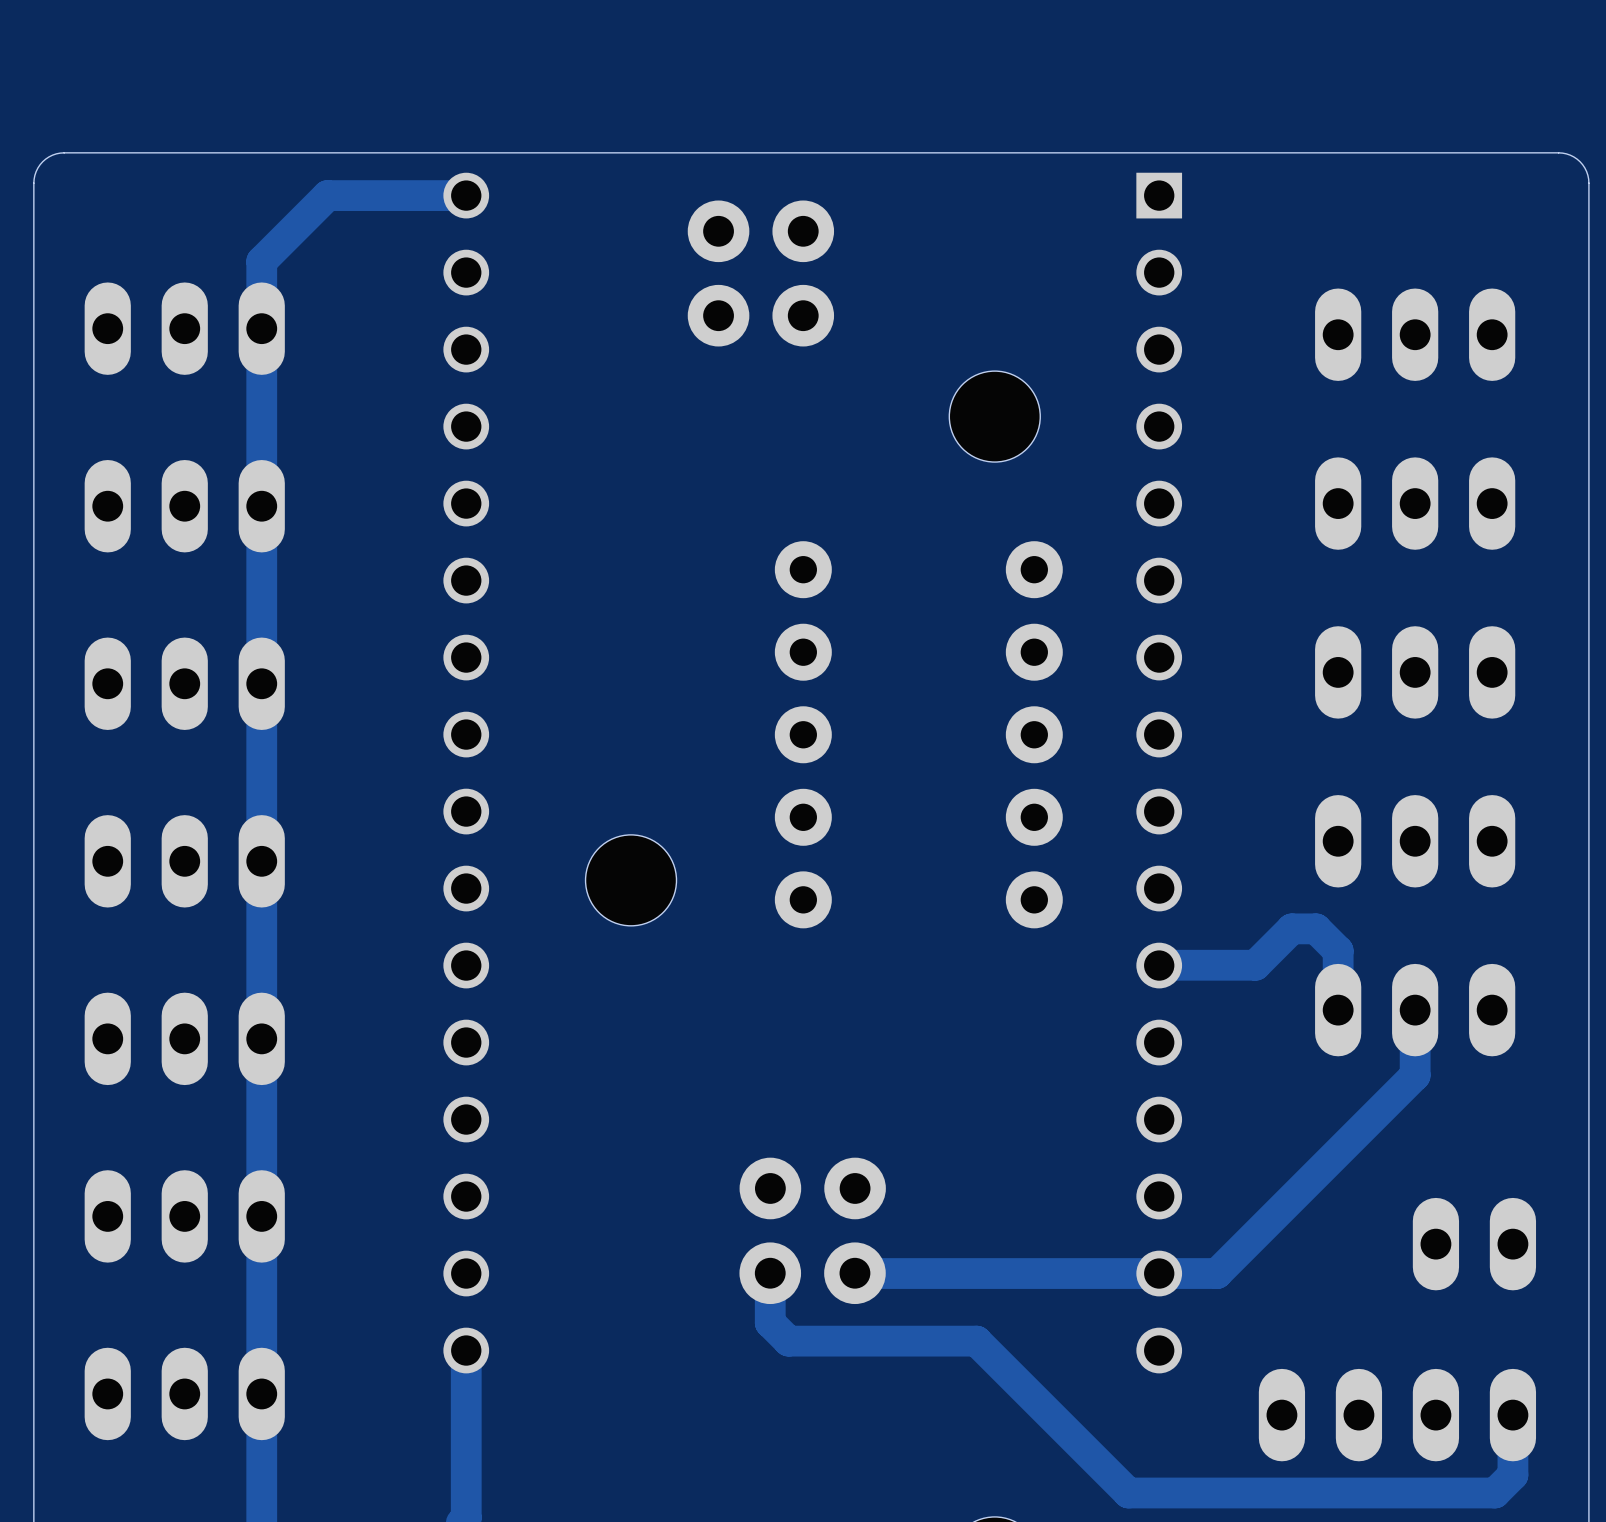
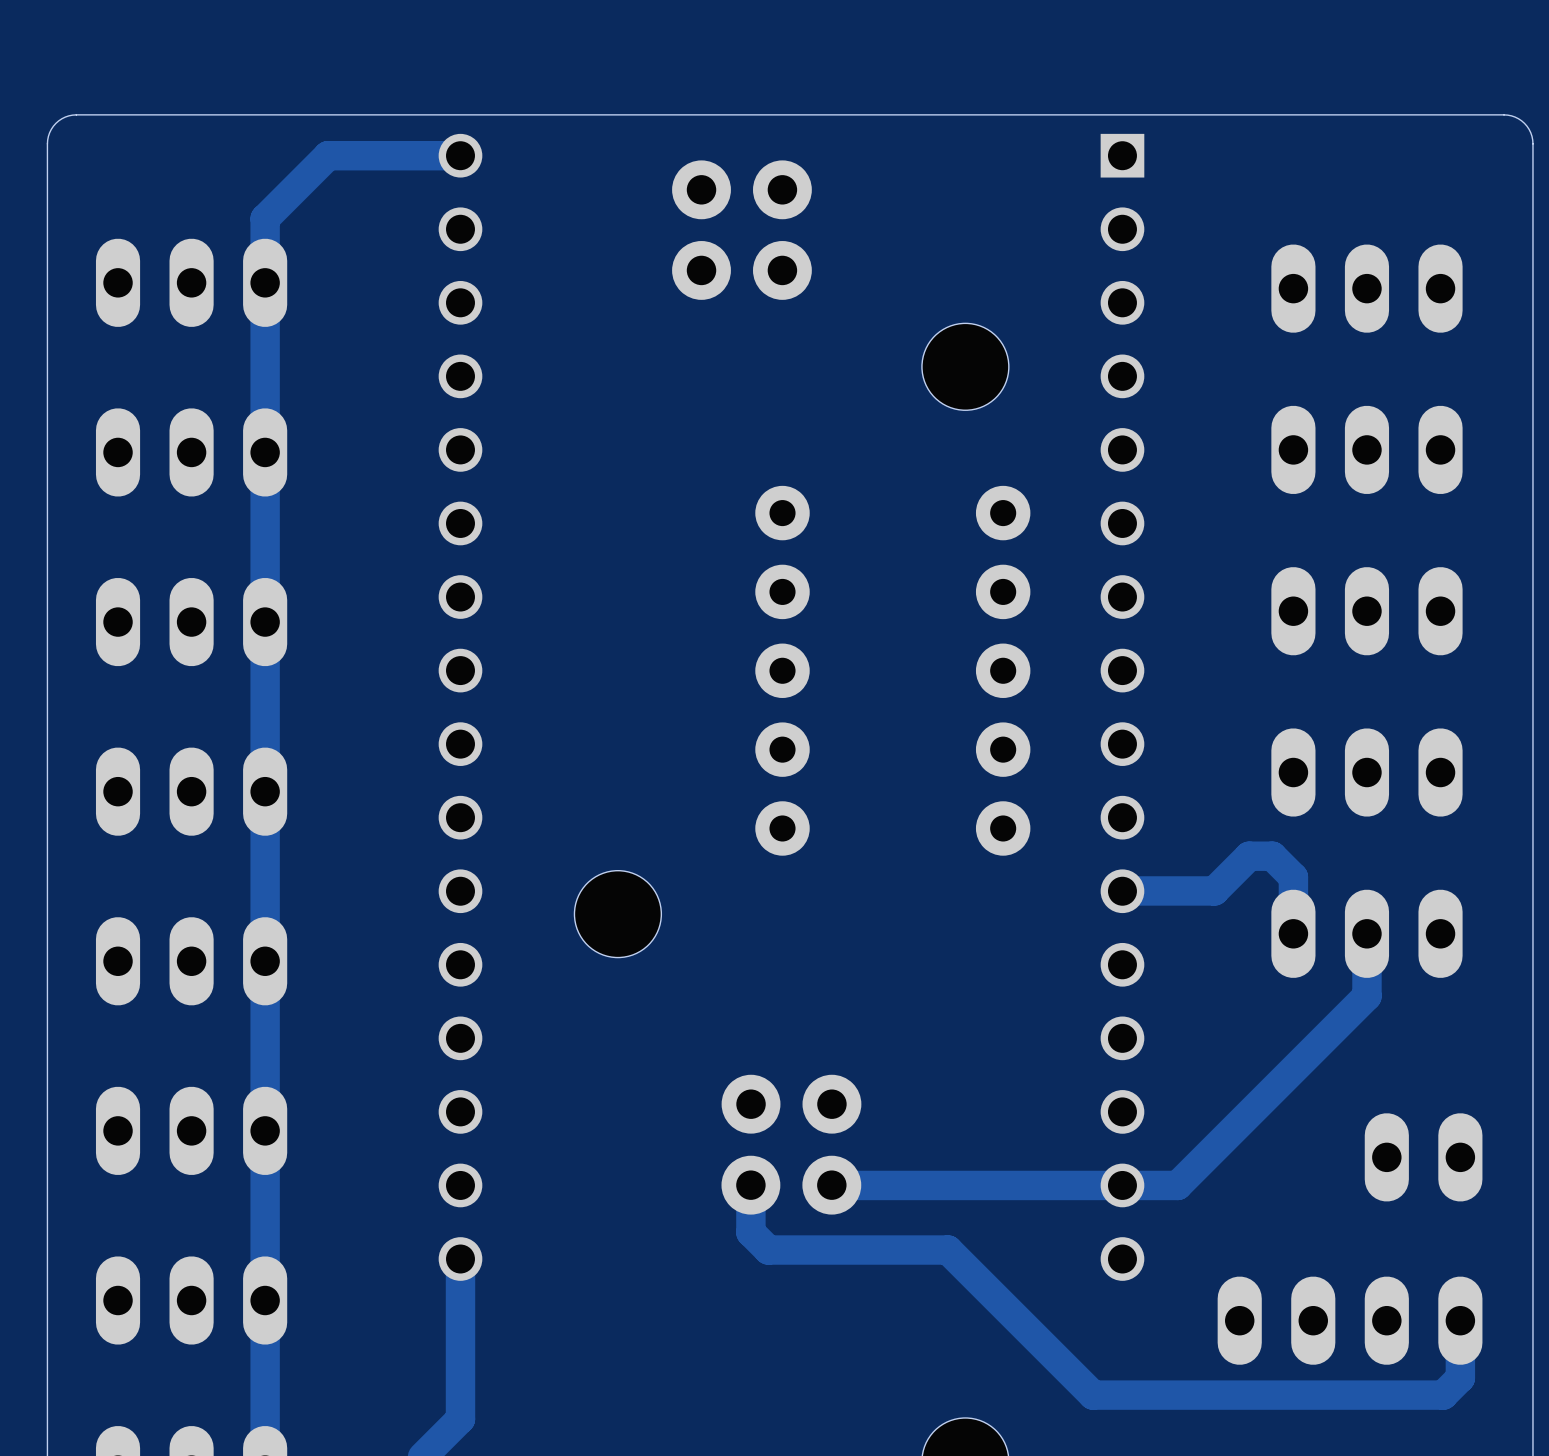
part position: (631, 880) -> (617, 914)

